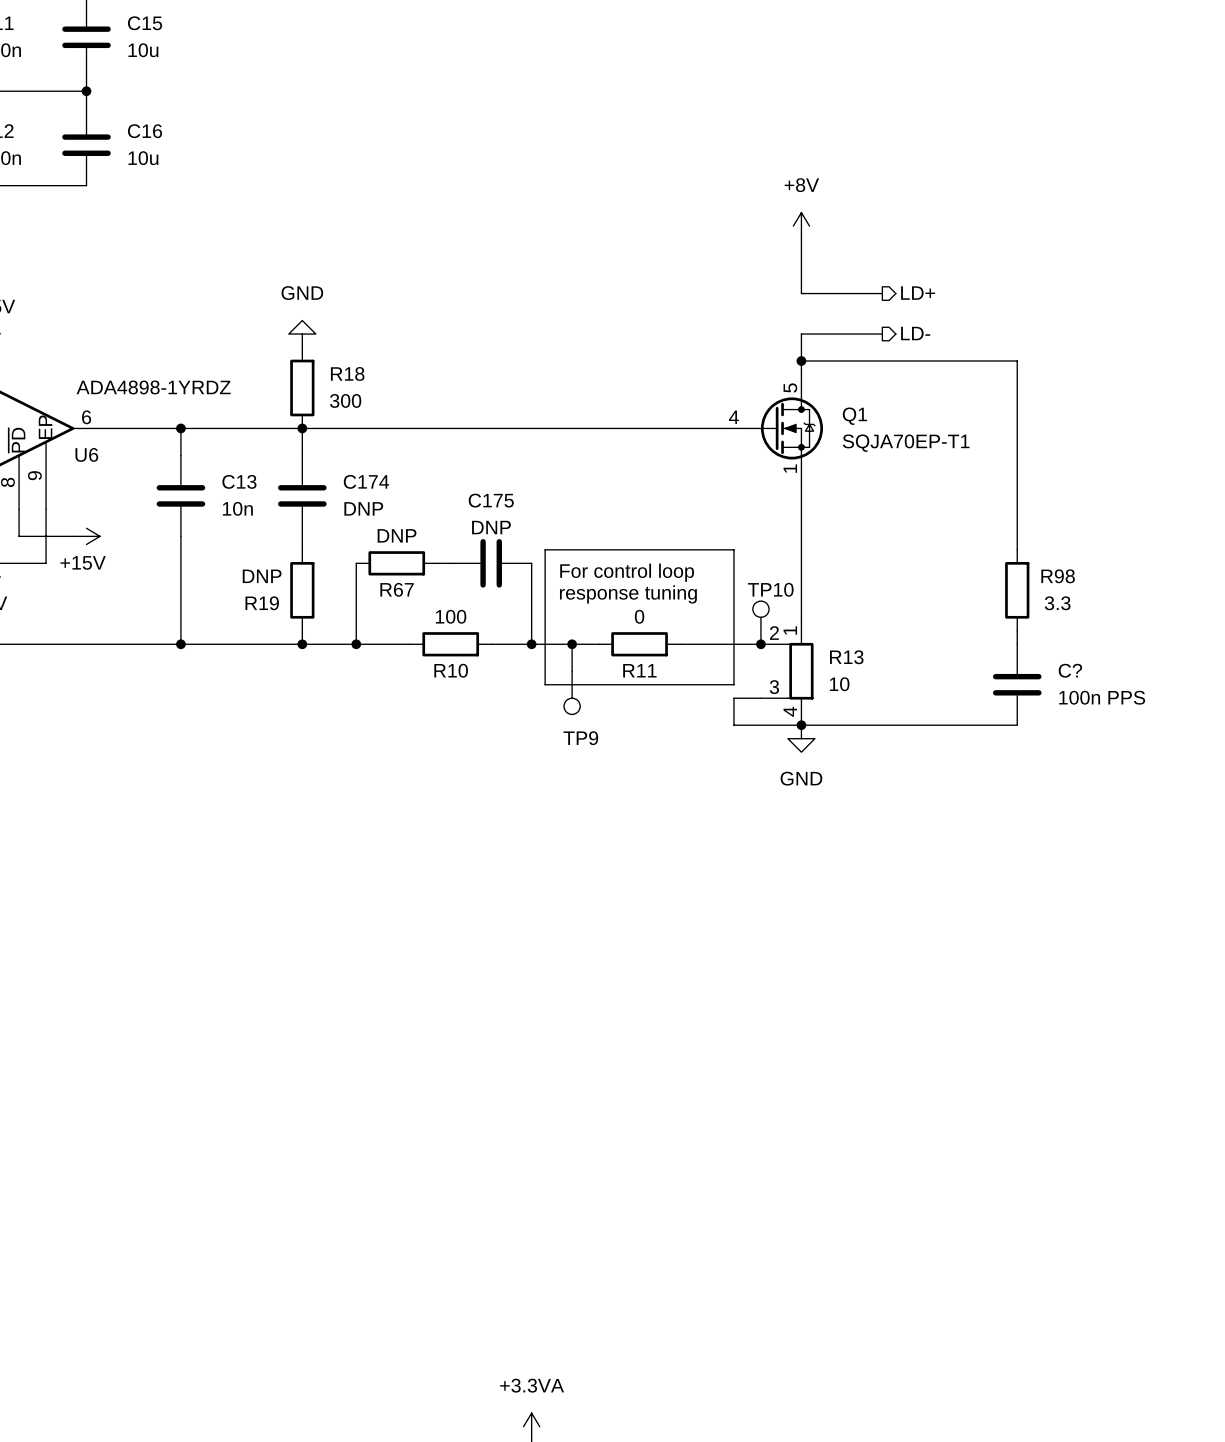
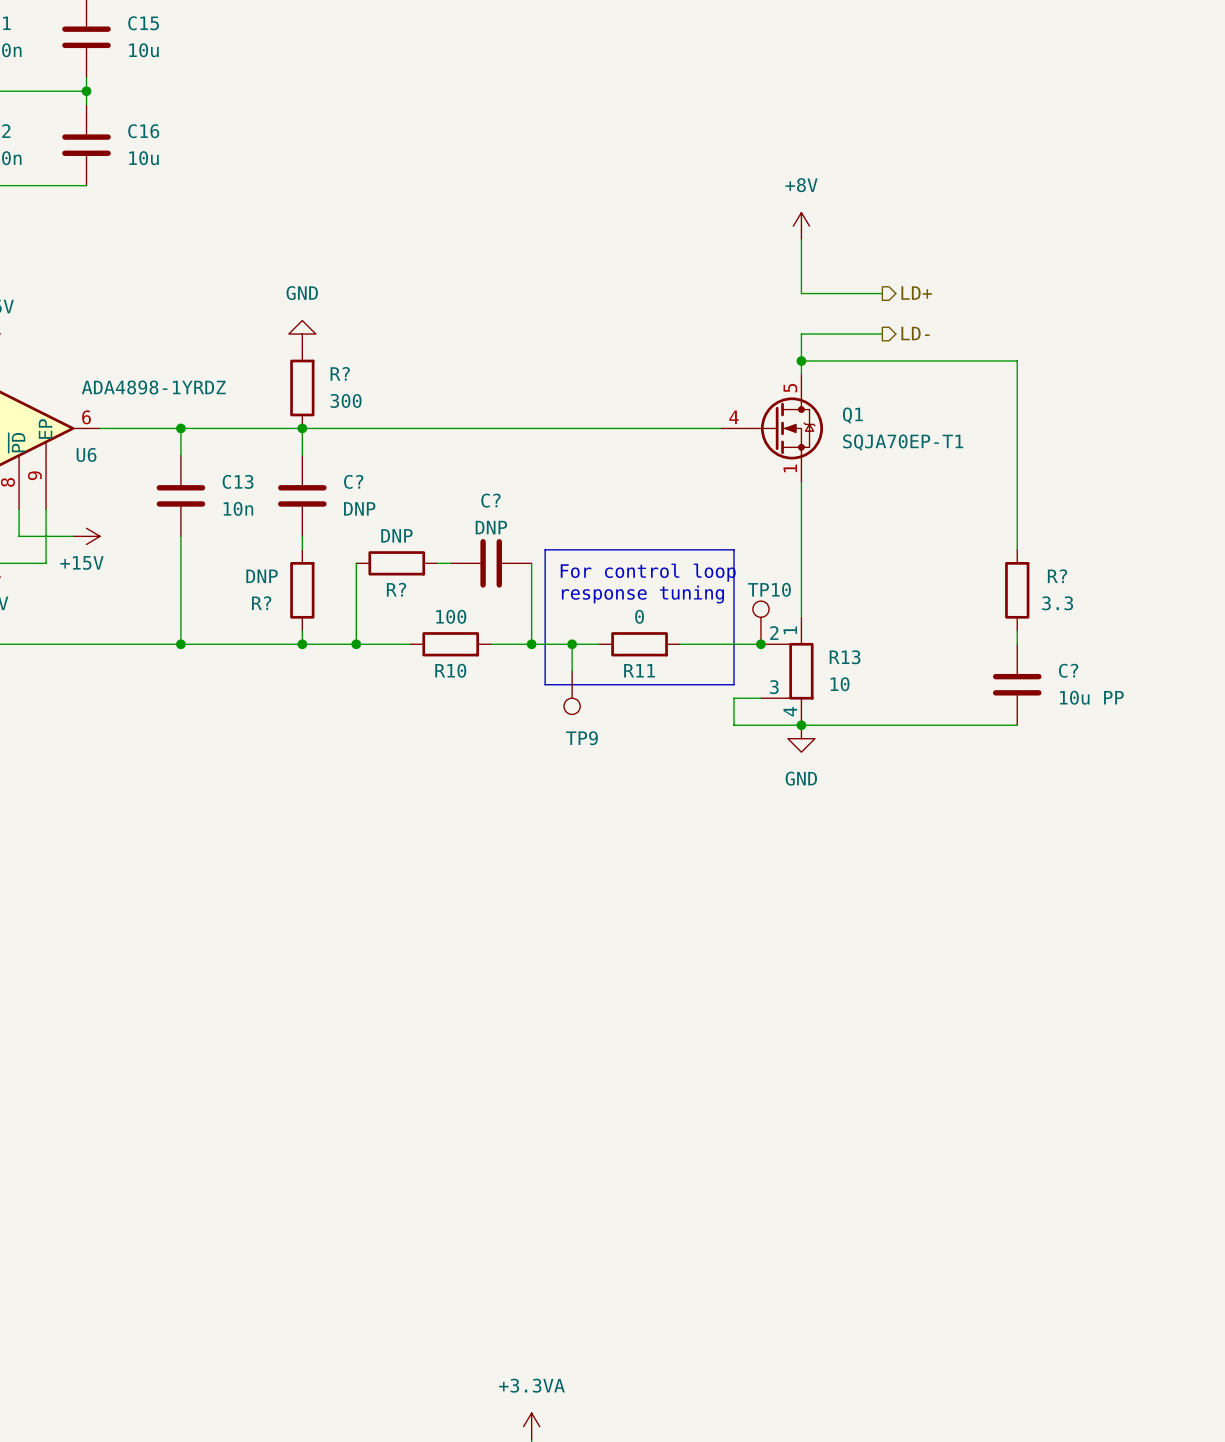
R18 name: R18 (347, 373) -> R? (340, 373)
C174 name: C174 (366, 481) -> C? (353, 481)
C175 name: C175 (491, 500) -> C? (490, 500)
R98 name: R98 (1058, 576) -> R? (1057, 576)
R67 name: R67 (397, 589) -> R? (396, 589)
R19 name: R19 (262, 603) -> R? (261, 603)
C? value: 100n PPS (1102, 697) -> 10u PP (1091, 697)

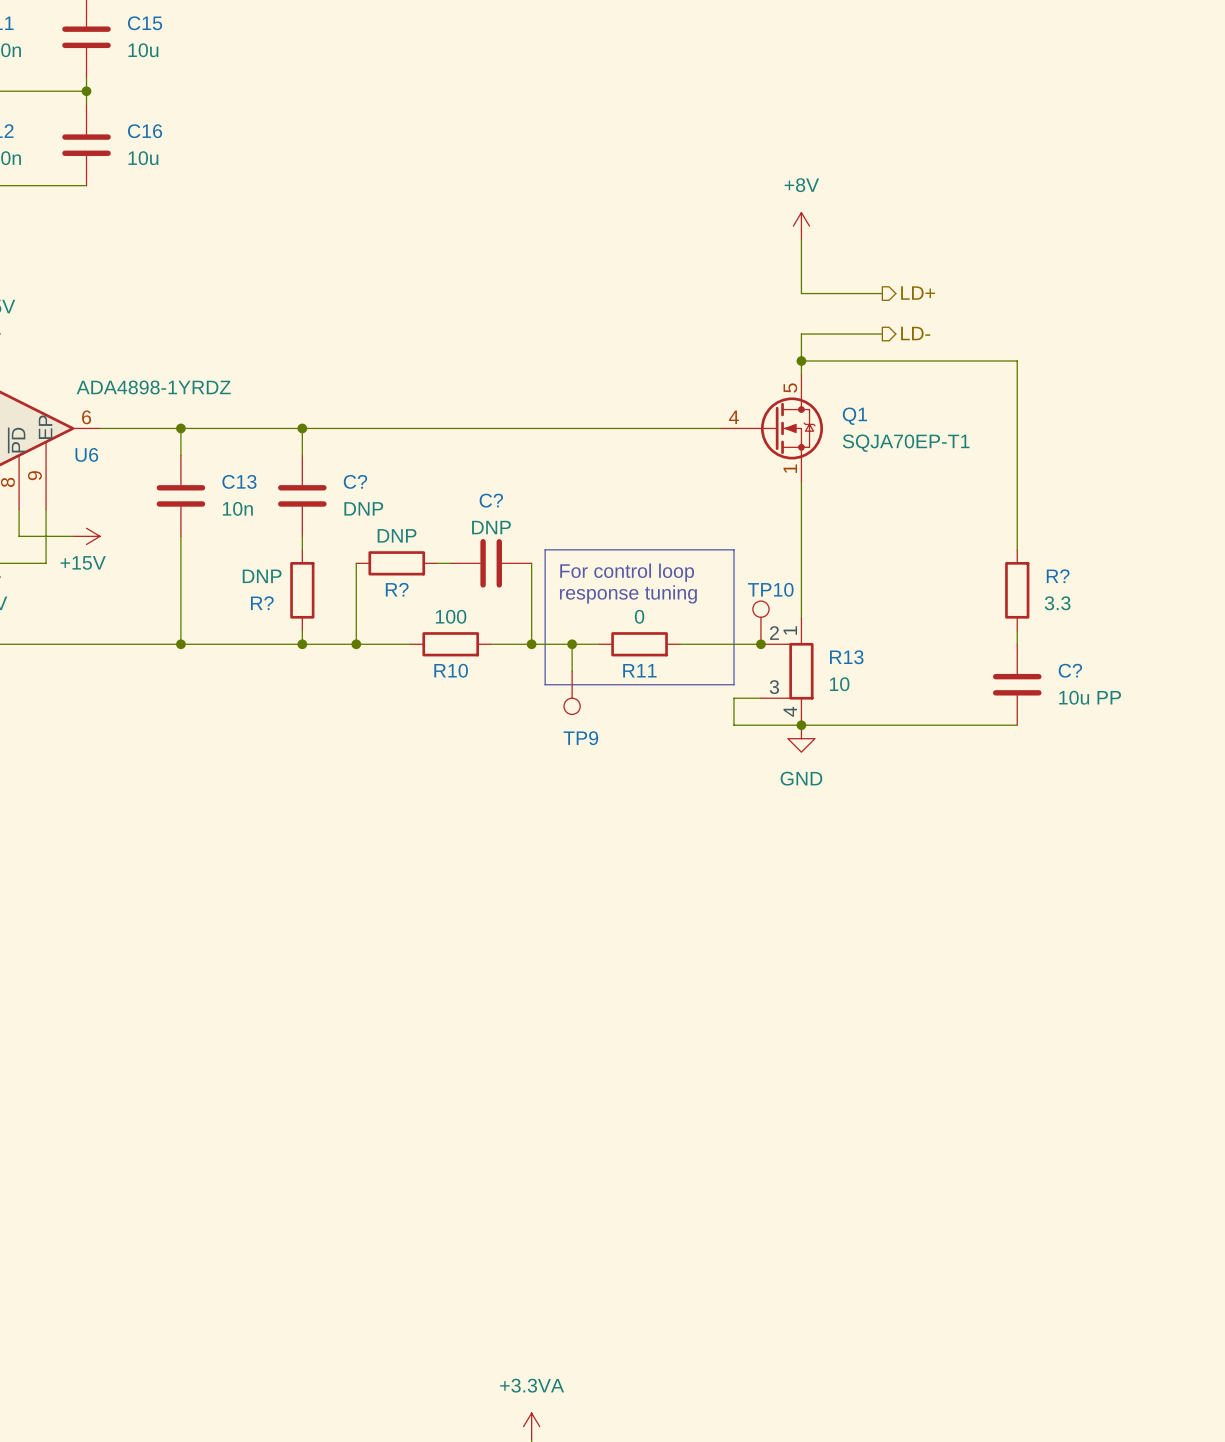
power symbol: GND (302, 334) -> none
R?: 300 (302, 387) -> none

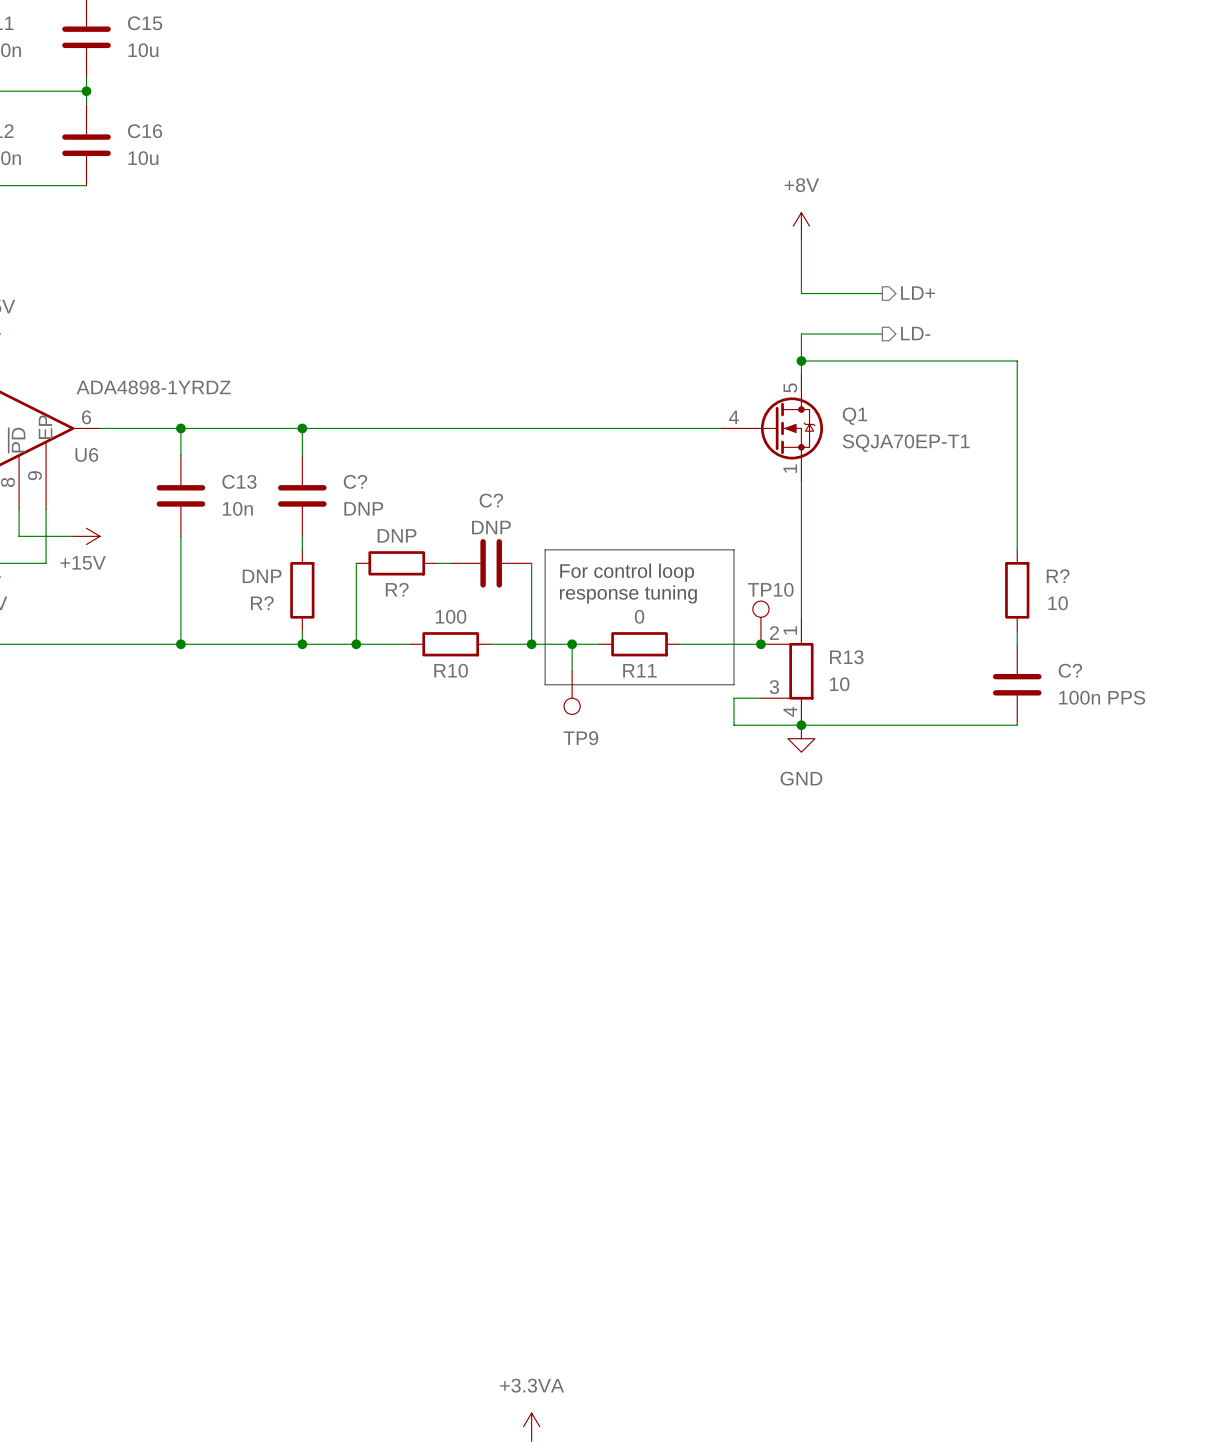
R? value: 3.3 (1057, 603) -> 10 (1058, 603)
C? value: 10u PP (1090, 697) -> 100n PPS (1102, 697)

